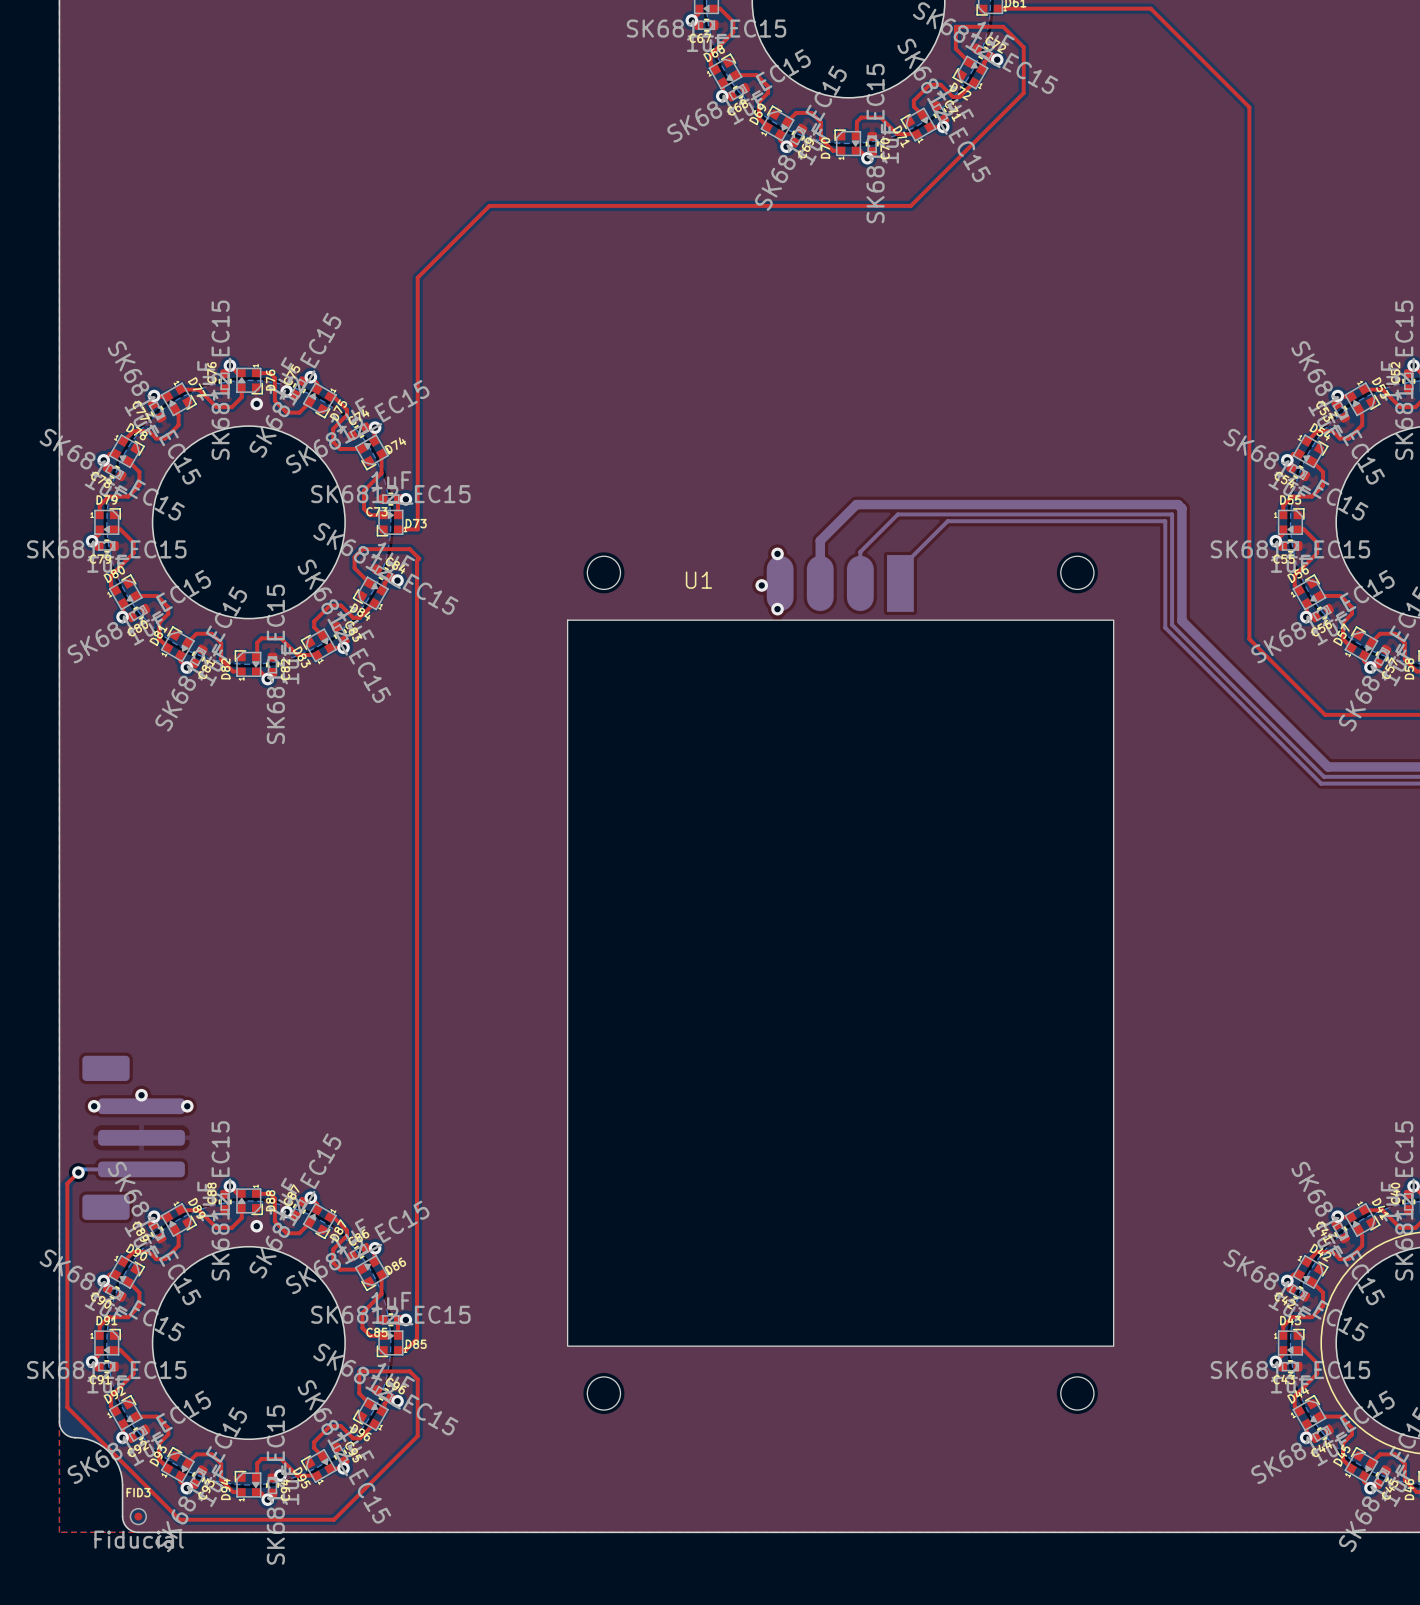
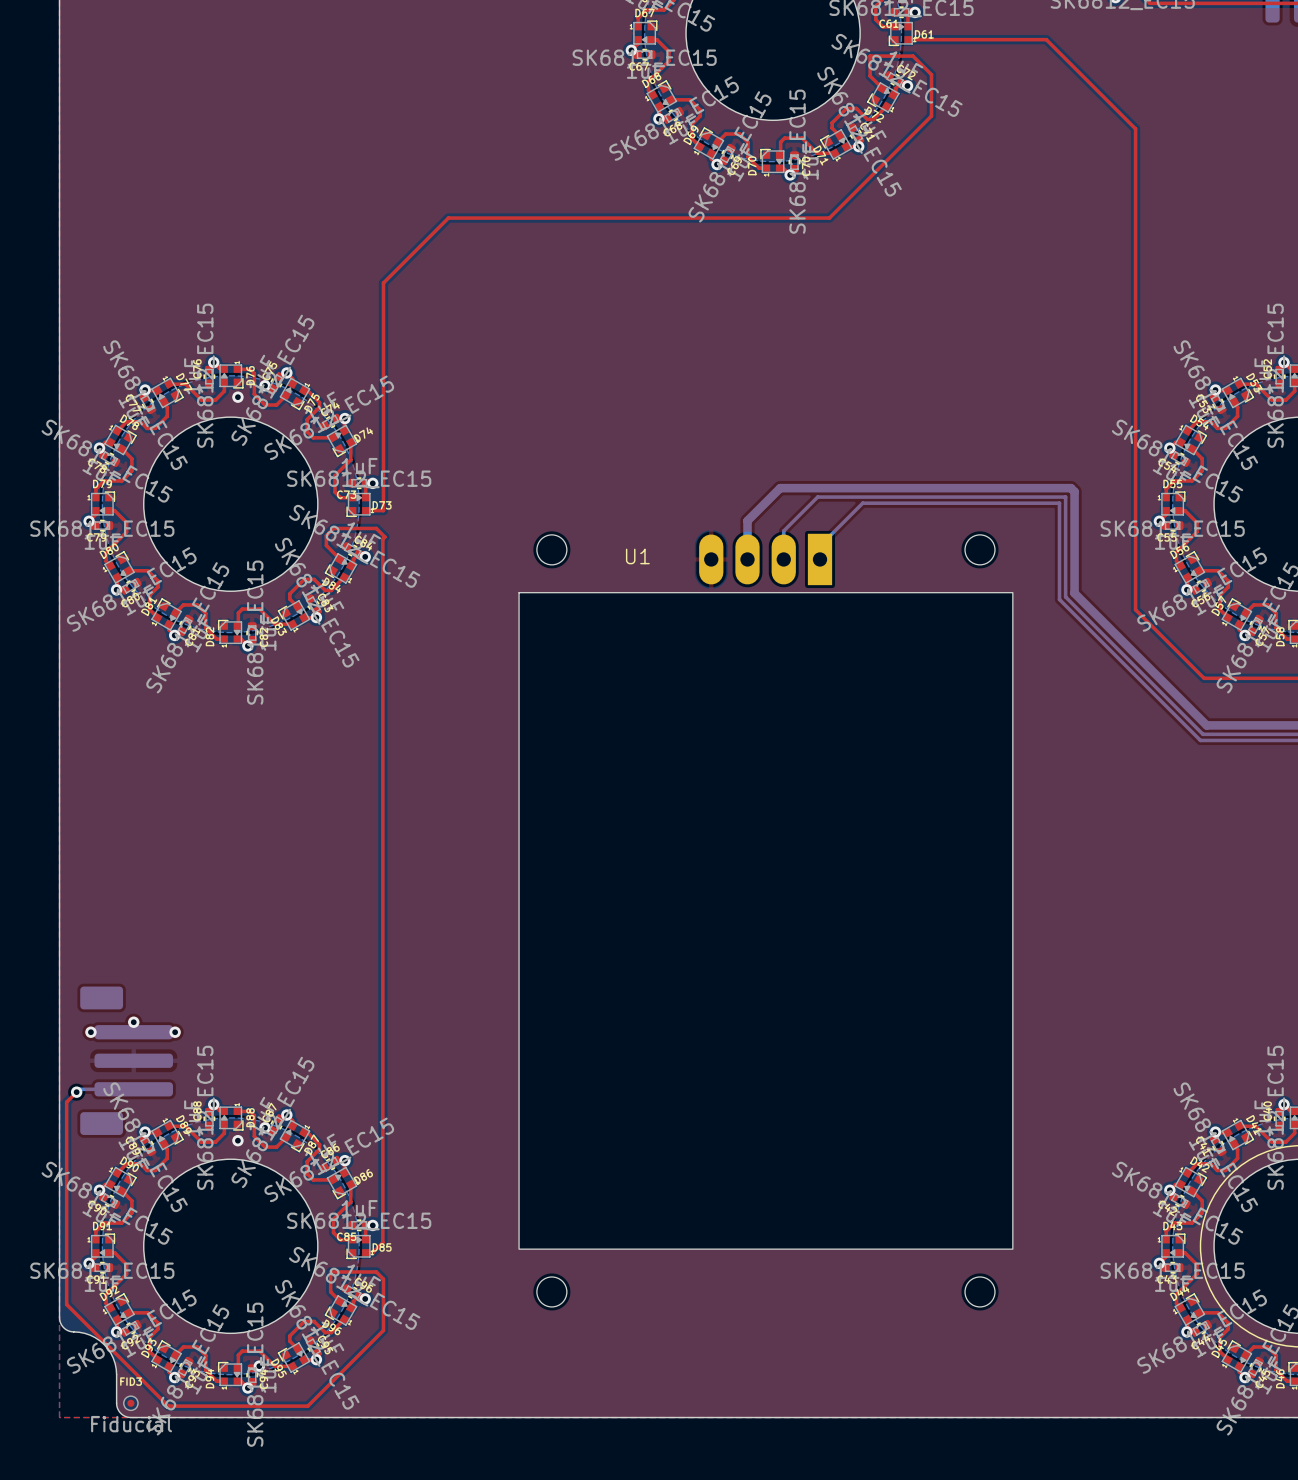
via: (777, 553) -> none
U1 footprint: [567, 555, 1115, 1411] -> [518, 533, 1014, 1307]
via: (761, 585) -> none
via: (777, 609) -> none

